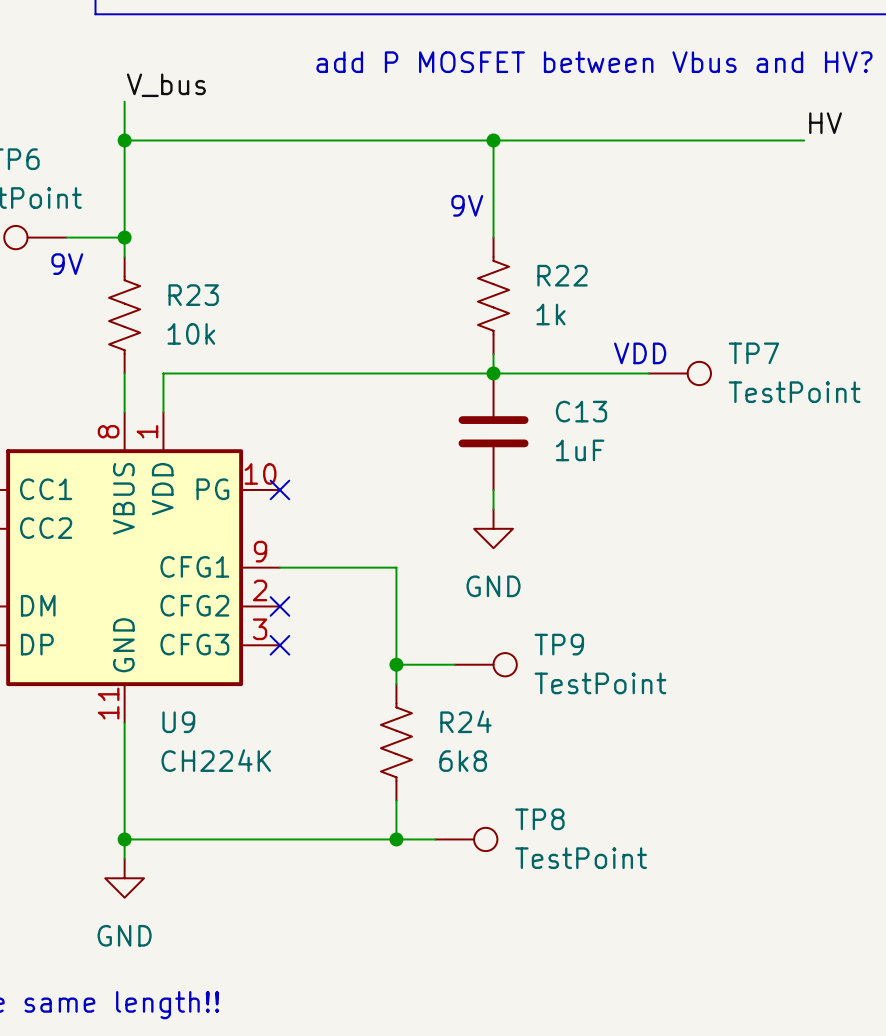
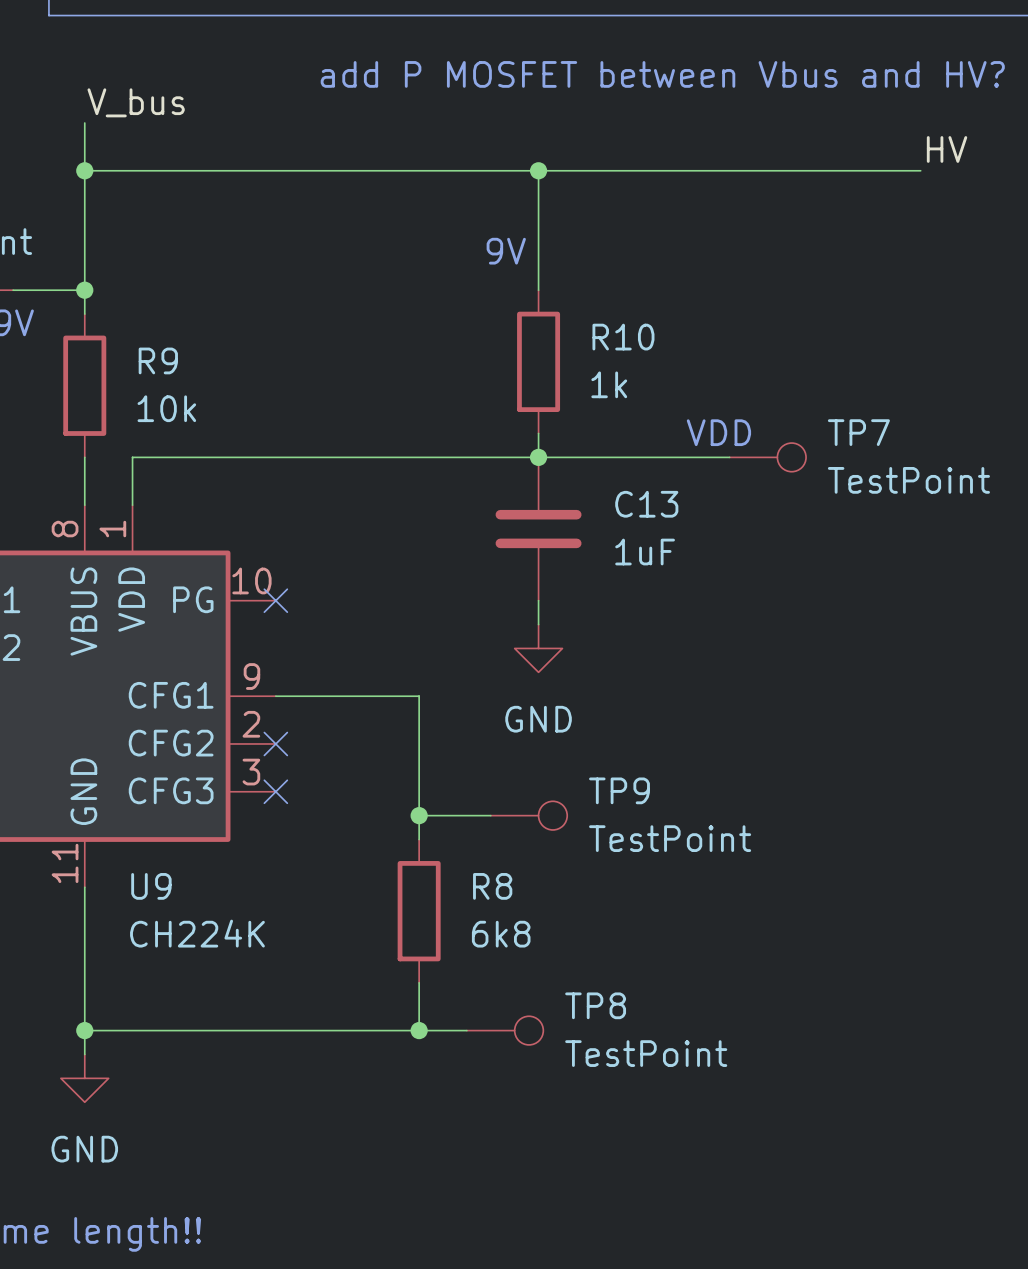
R22: 1k (493, 295) -> none
R10: none -> 1k (538, 361)
R23: 10k (124, 315) -> none
R9: none -> 10k (84, 385)
R24: 6k8 (396, 742) -> none
R8: none -> 6k8 (419, 911)

